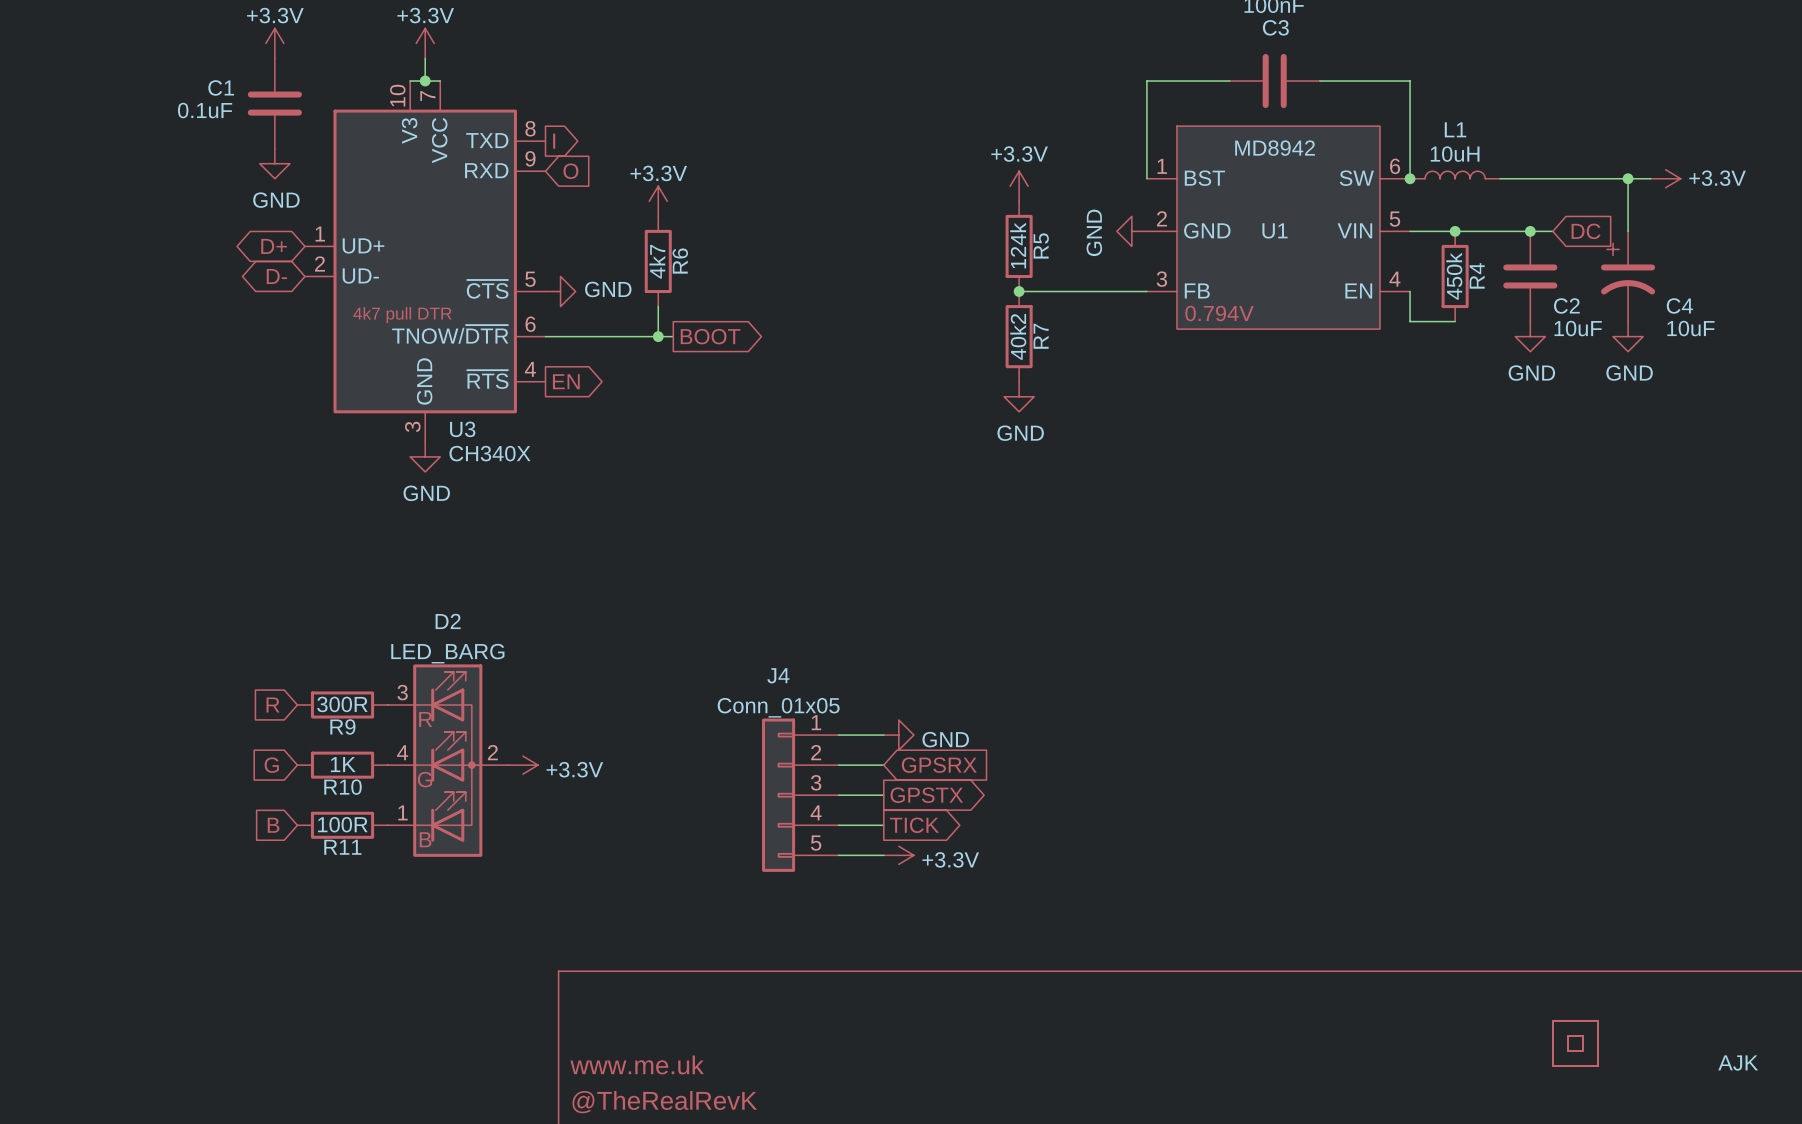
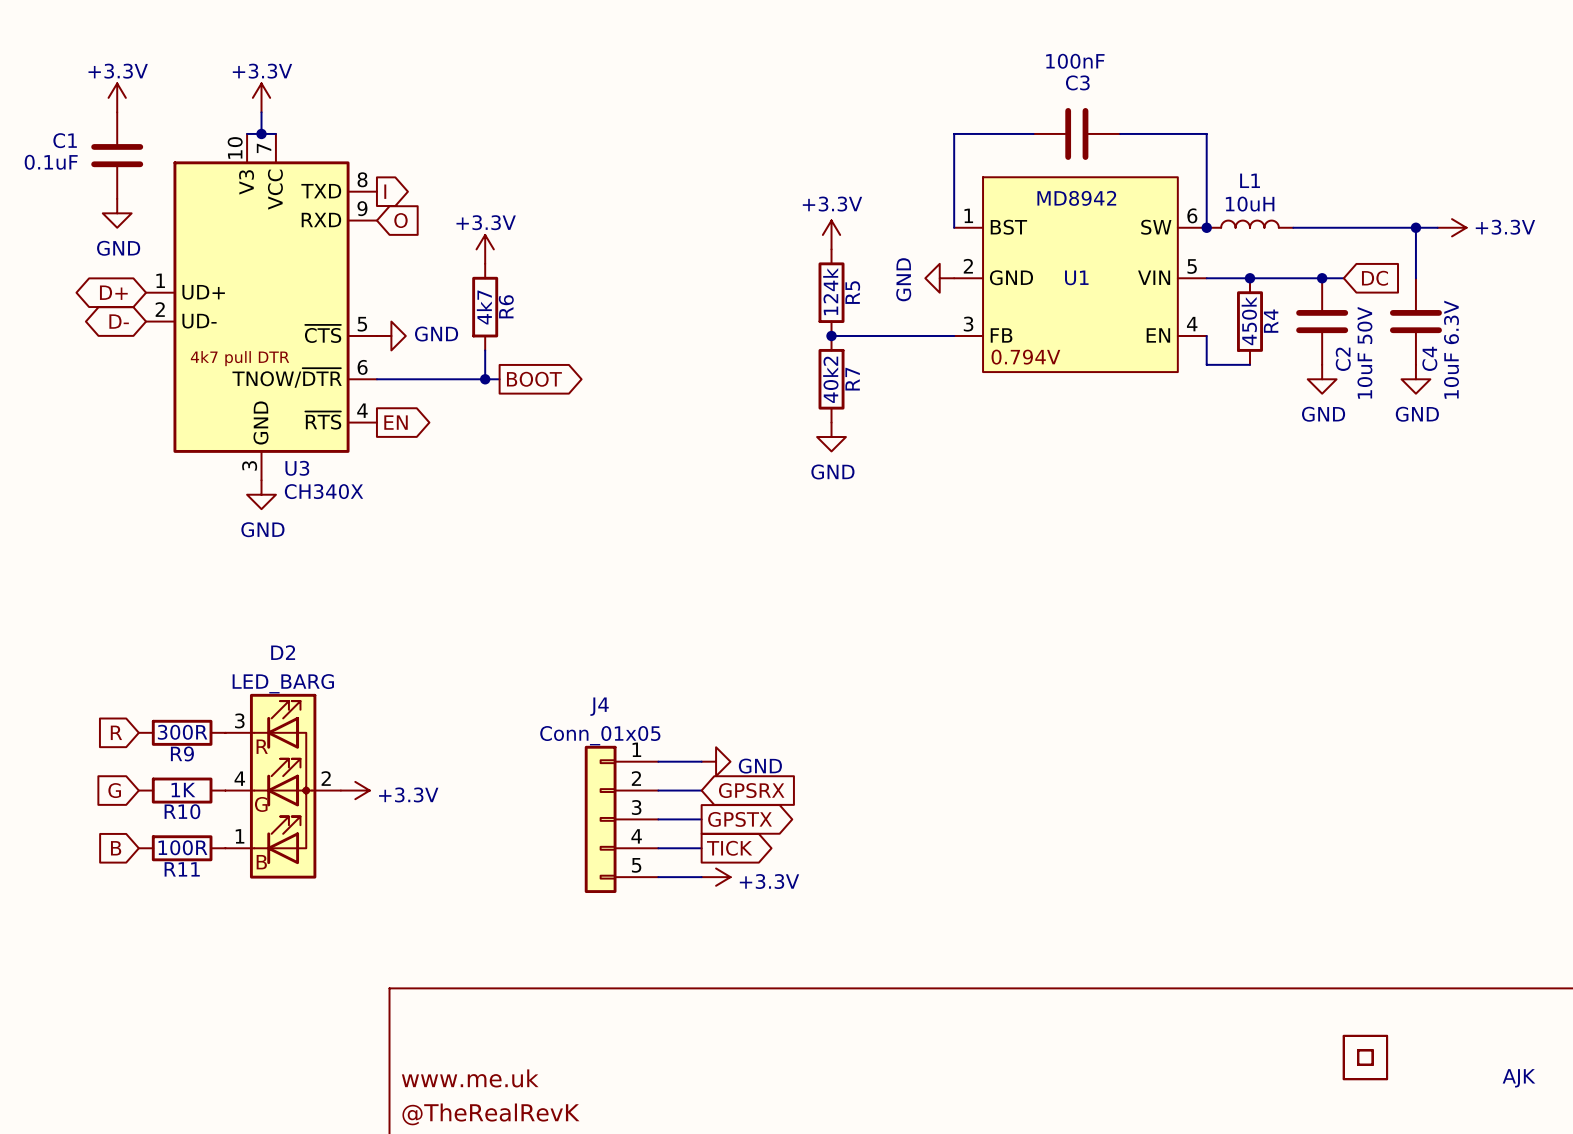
C4 symbol: [1600, 231, 1656, 322] -> [1389, 278, 1442, 365]
C2 name rotation: 0° (1566, 305) -> 90° counterclockwise (1343, 359)
C4 name position: C4 (1679, 305) -> C4 (1429, 358)
C2 value: 10uF (1578, 328) -> 10uF 50V (1364, 352)
C4 value: 10uF (1690, 328) -> 10uF 6.3V (1451, 349)

